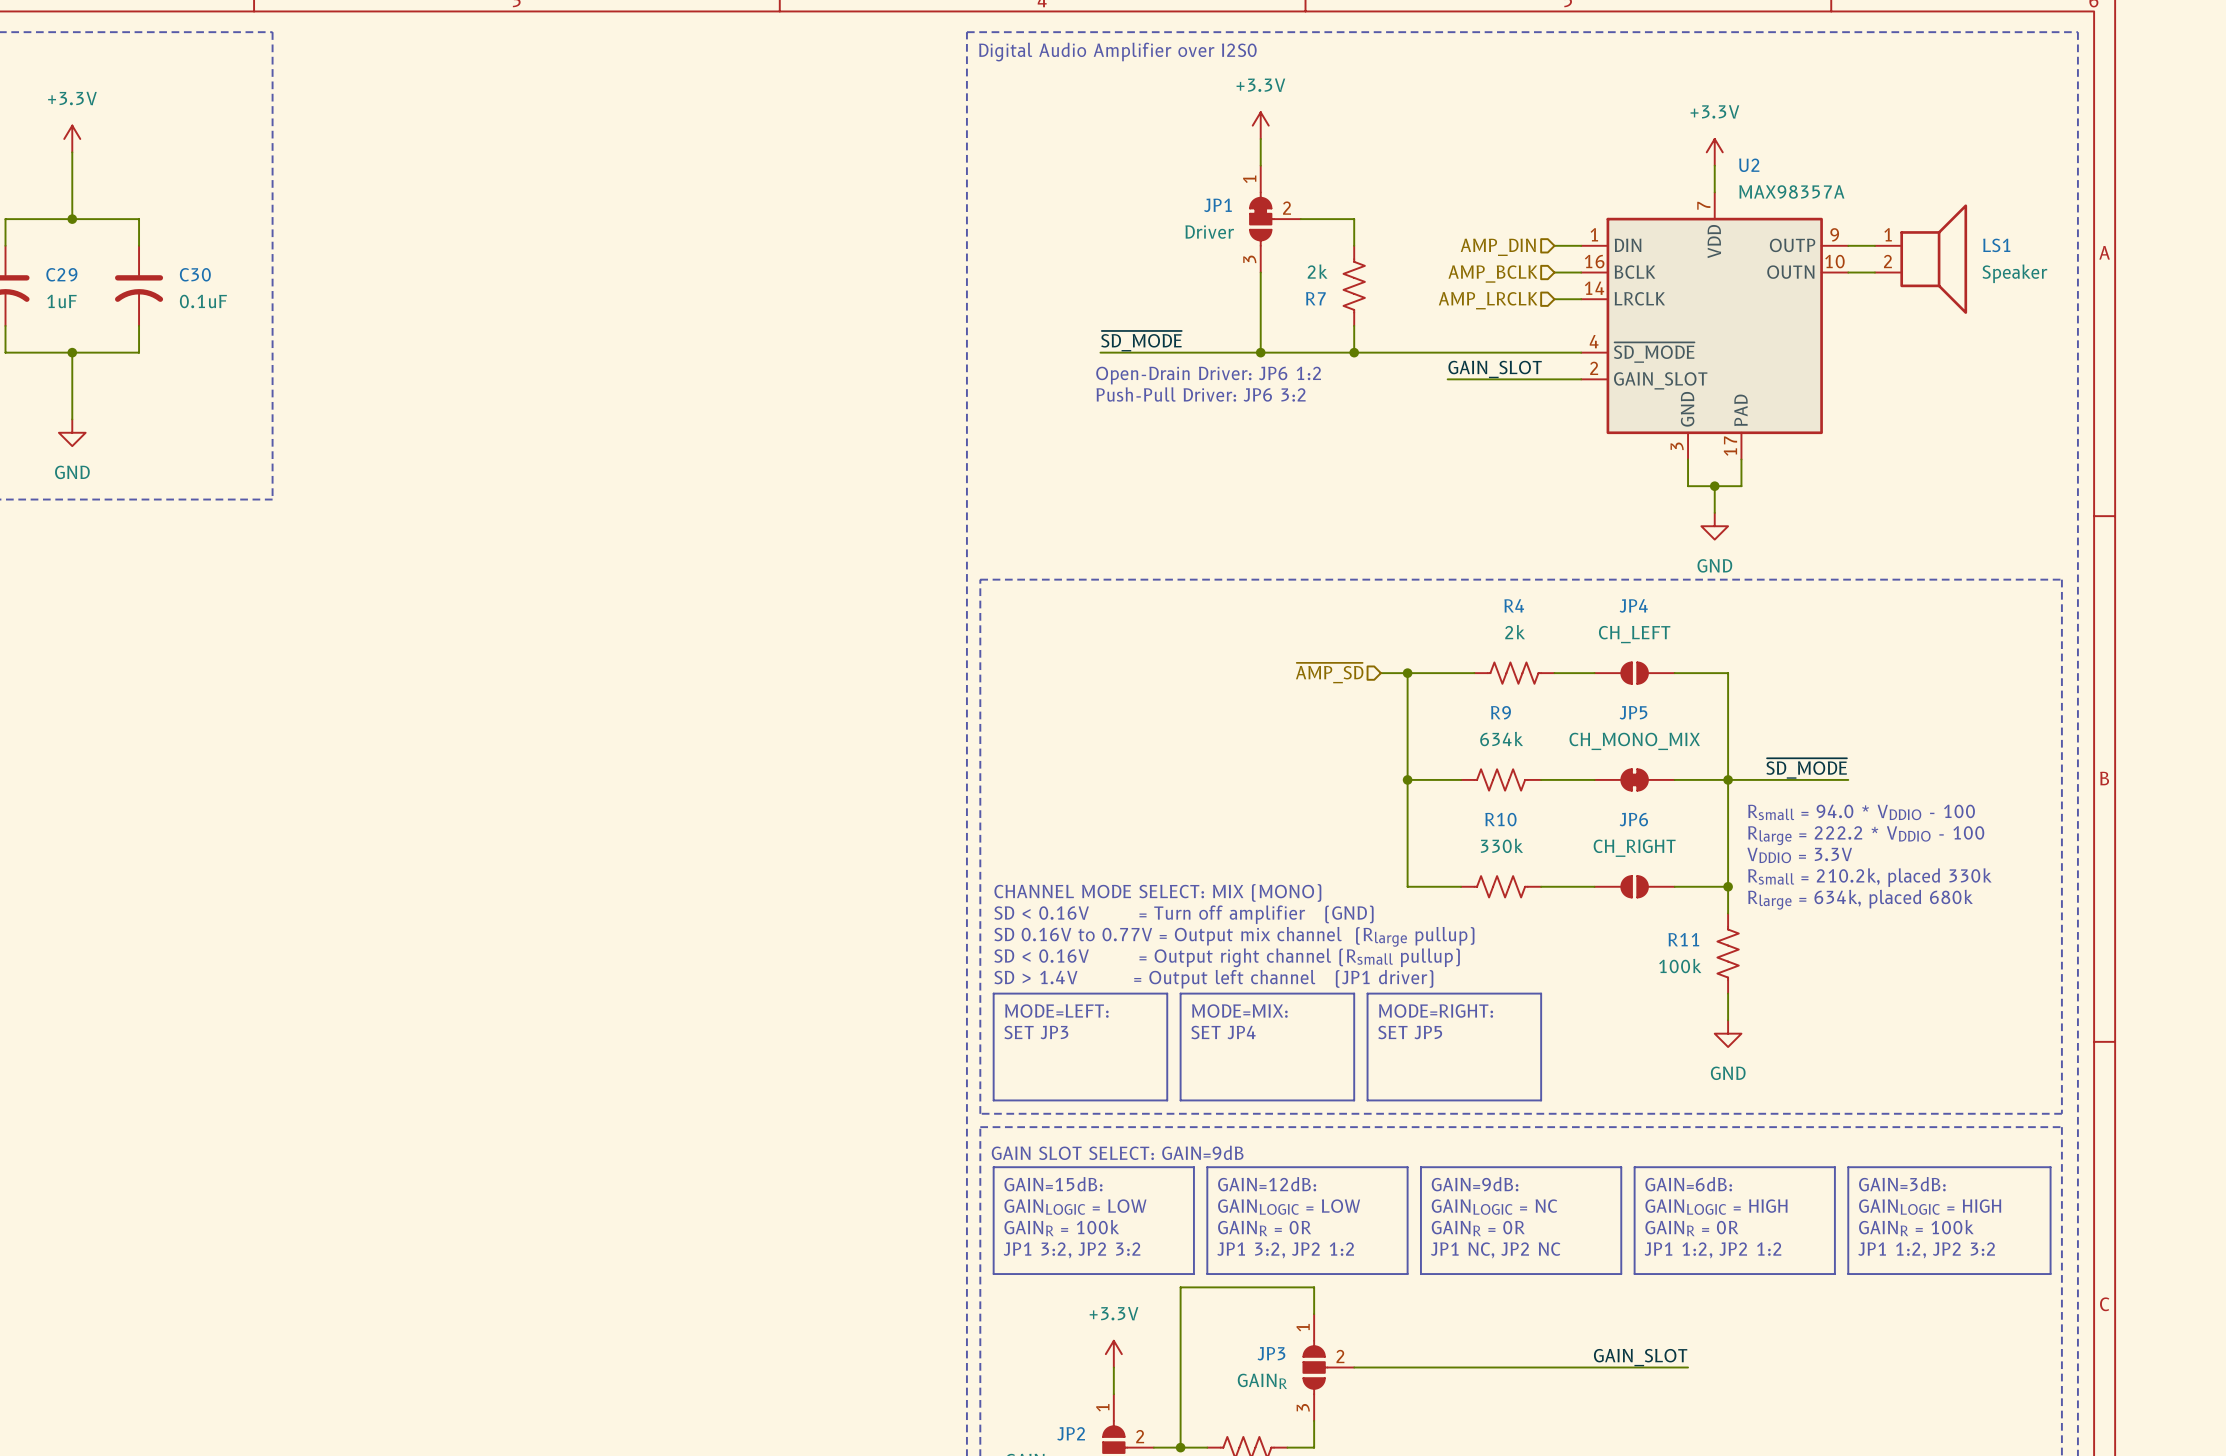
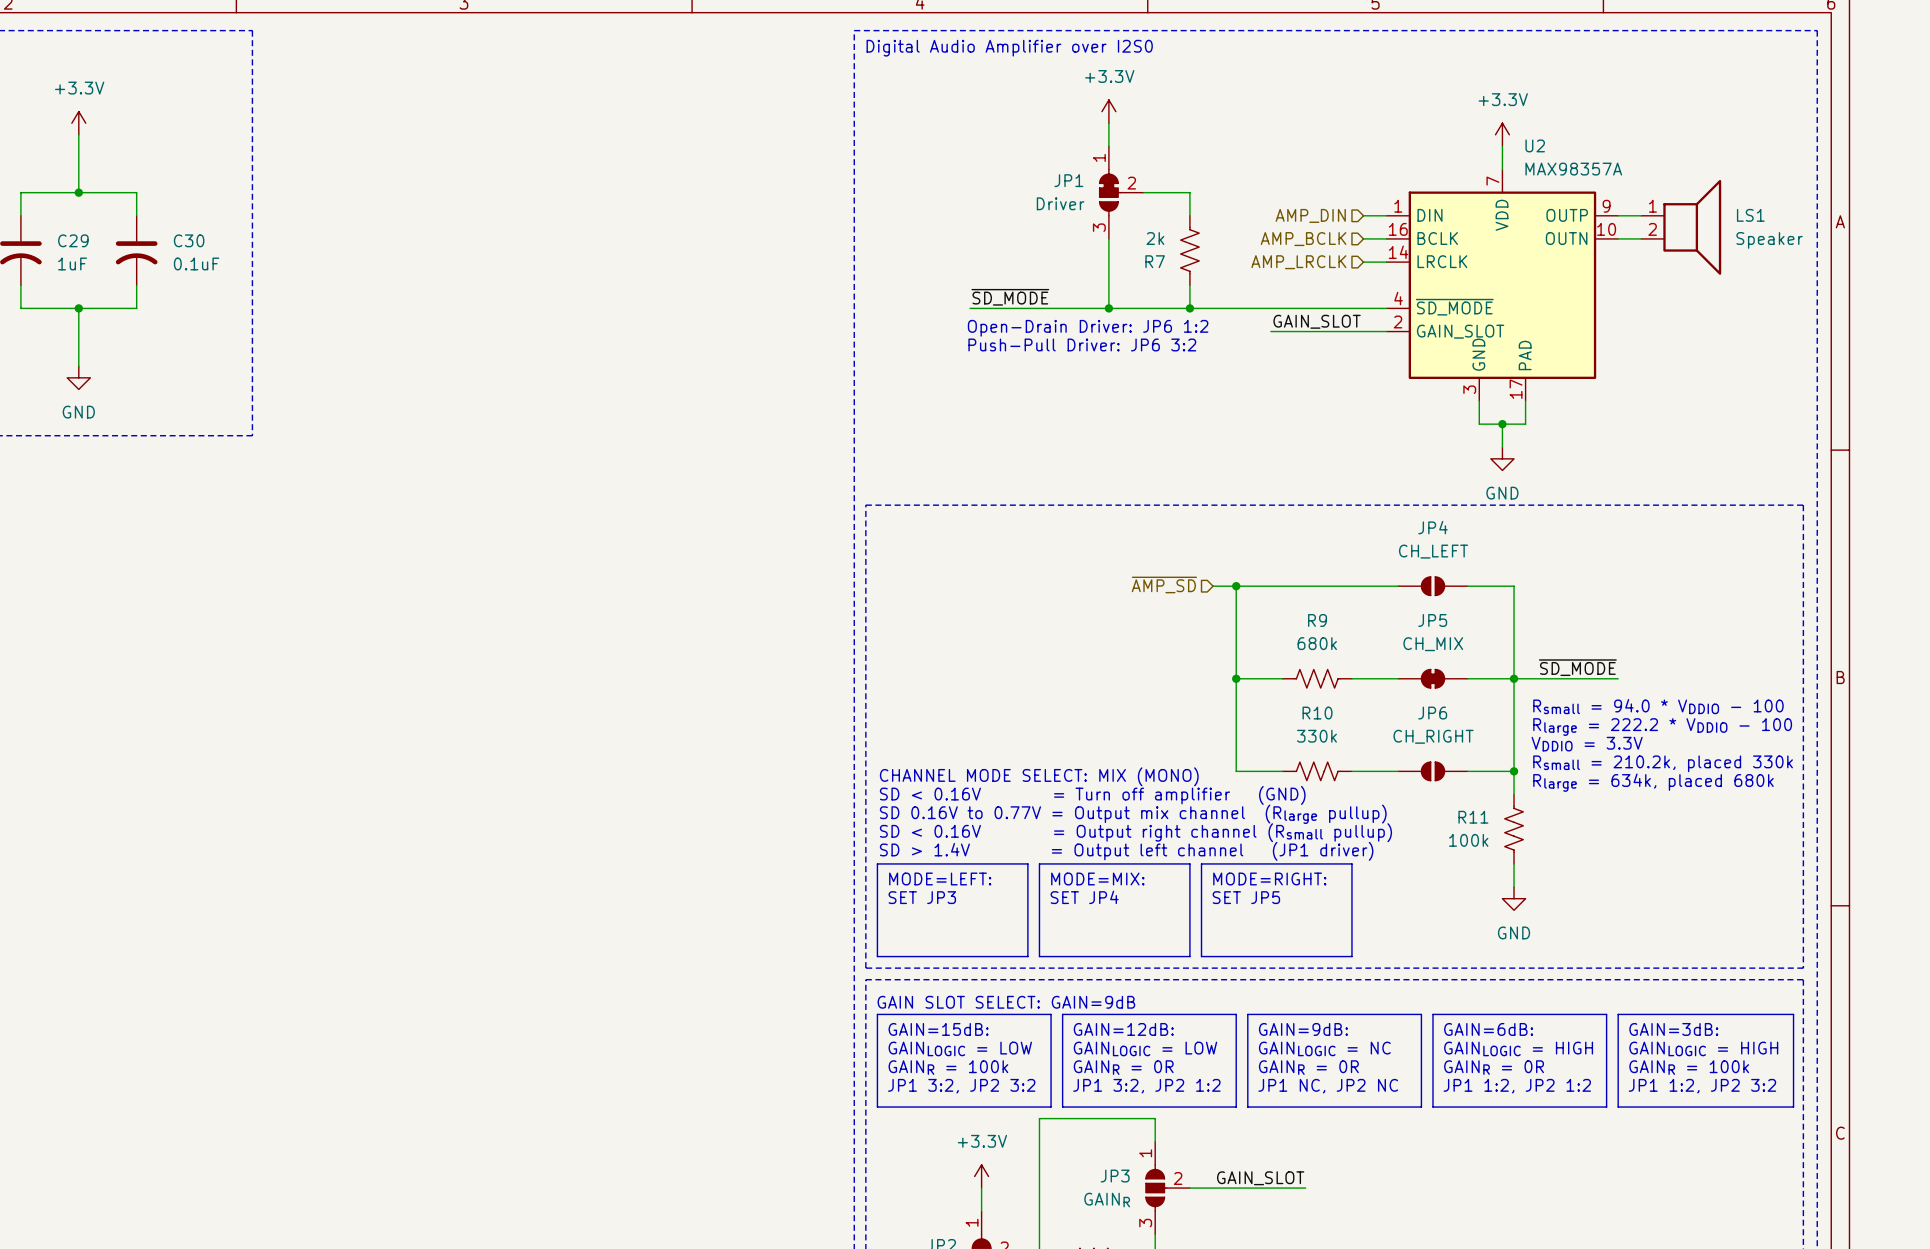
R4: 2k (1514, 673) -> none
R9 value: 634k (1501, 739) -> 680k (1317, 643)
JP5 value: CH_MONO_MIX (1634, 741) -> CH_MIX (1433, 644)
label position: GAIN_SLOT (1640, 1357) -> GAIN_SLOT (1260, 1178)
wire: (1487, 1367) (1688, 1367) -> none

